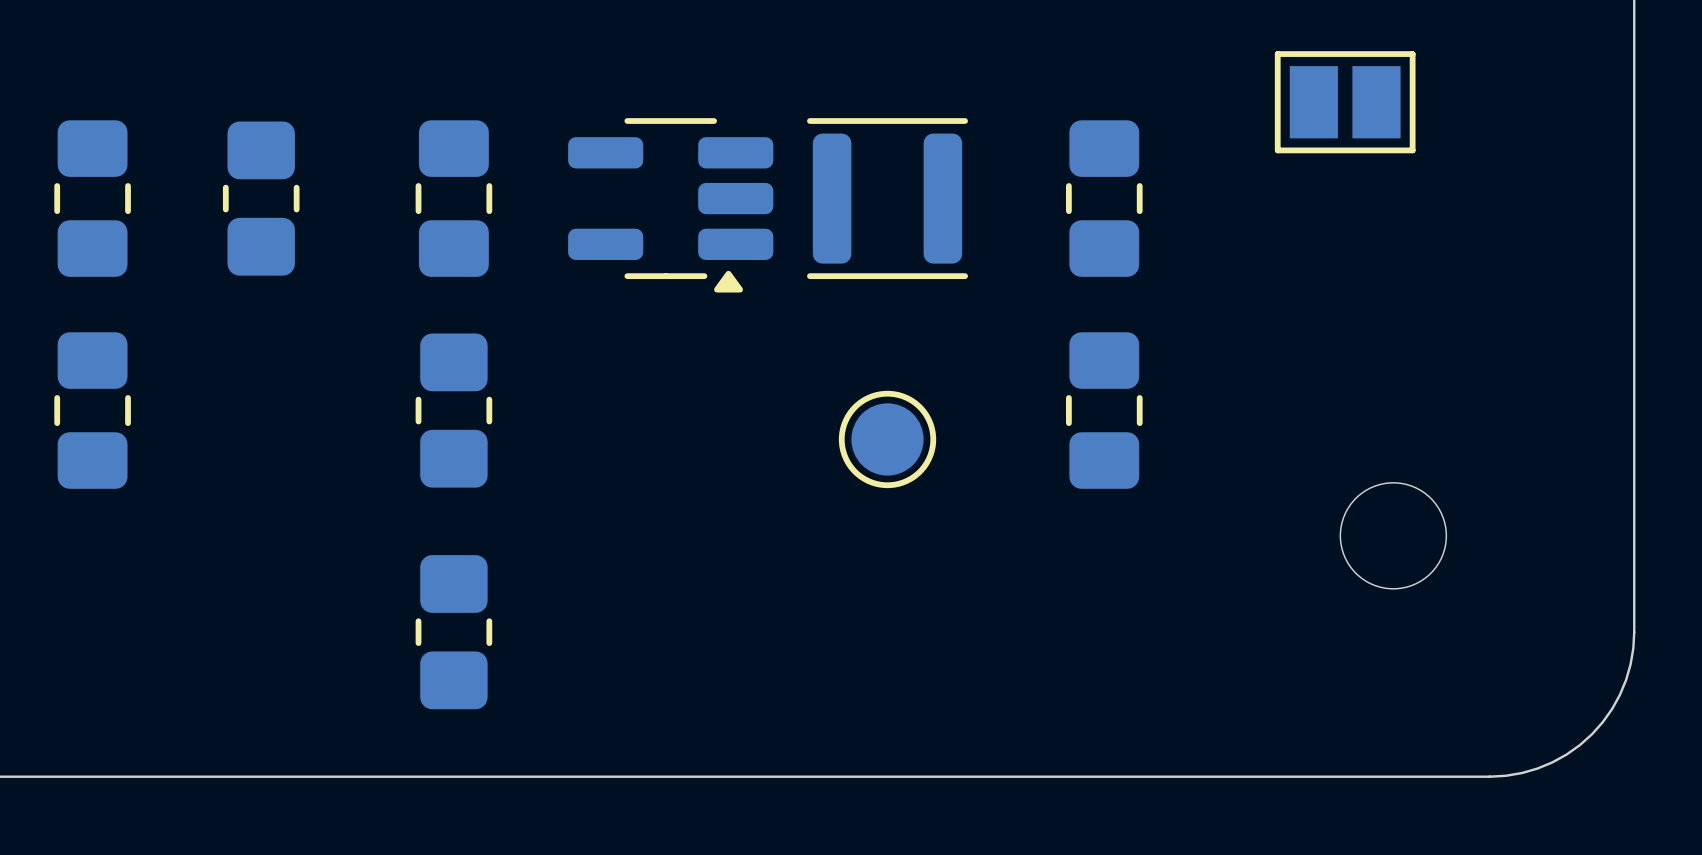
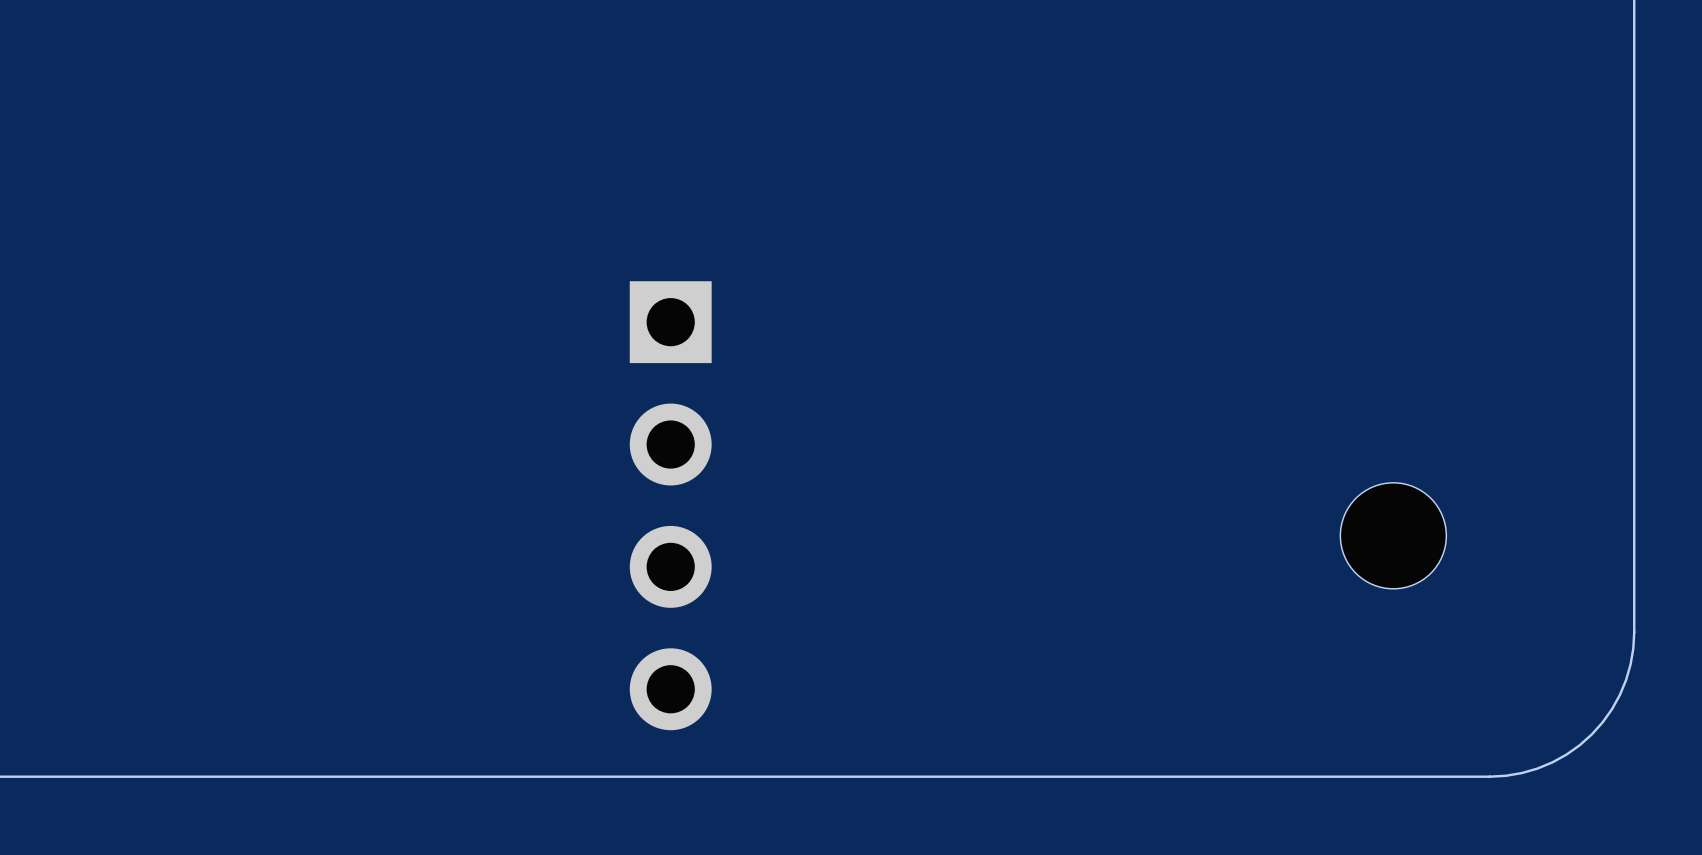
part: (1345, 102) -> none
part: (92, 198) -> none
part: (261, 198) -> none
part: (453, 198) -> none
part: (887, 198) -> none
part: (1104, 198) -> none
part: (670, 205) -> none
part: (92, 410) -> none
part: (453, 410) -> none
part: (1104, 410) -> none
part: (887, 439) -> none
part: none -> (670, 505)
part: (453, 632) -> none

